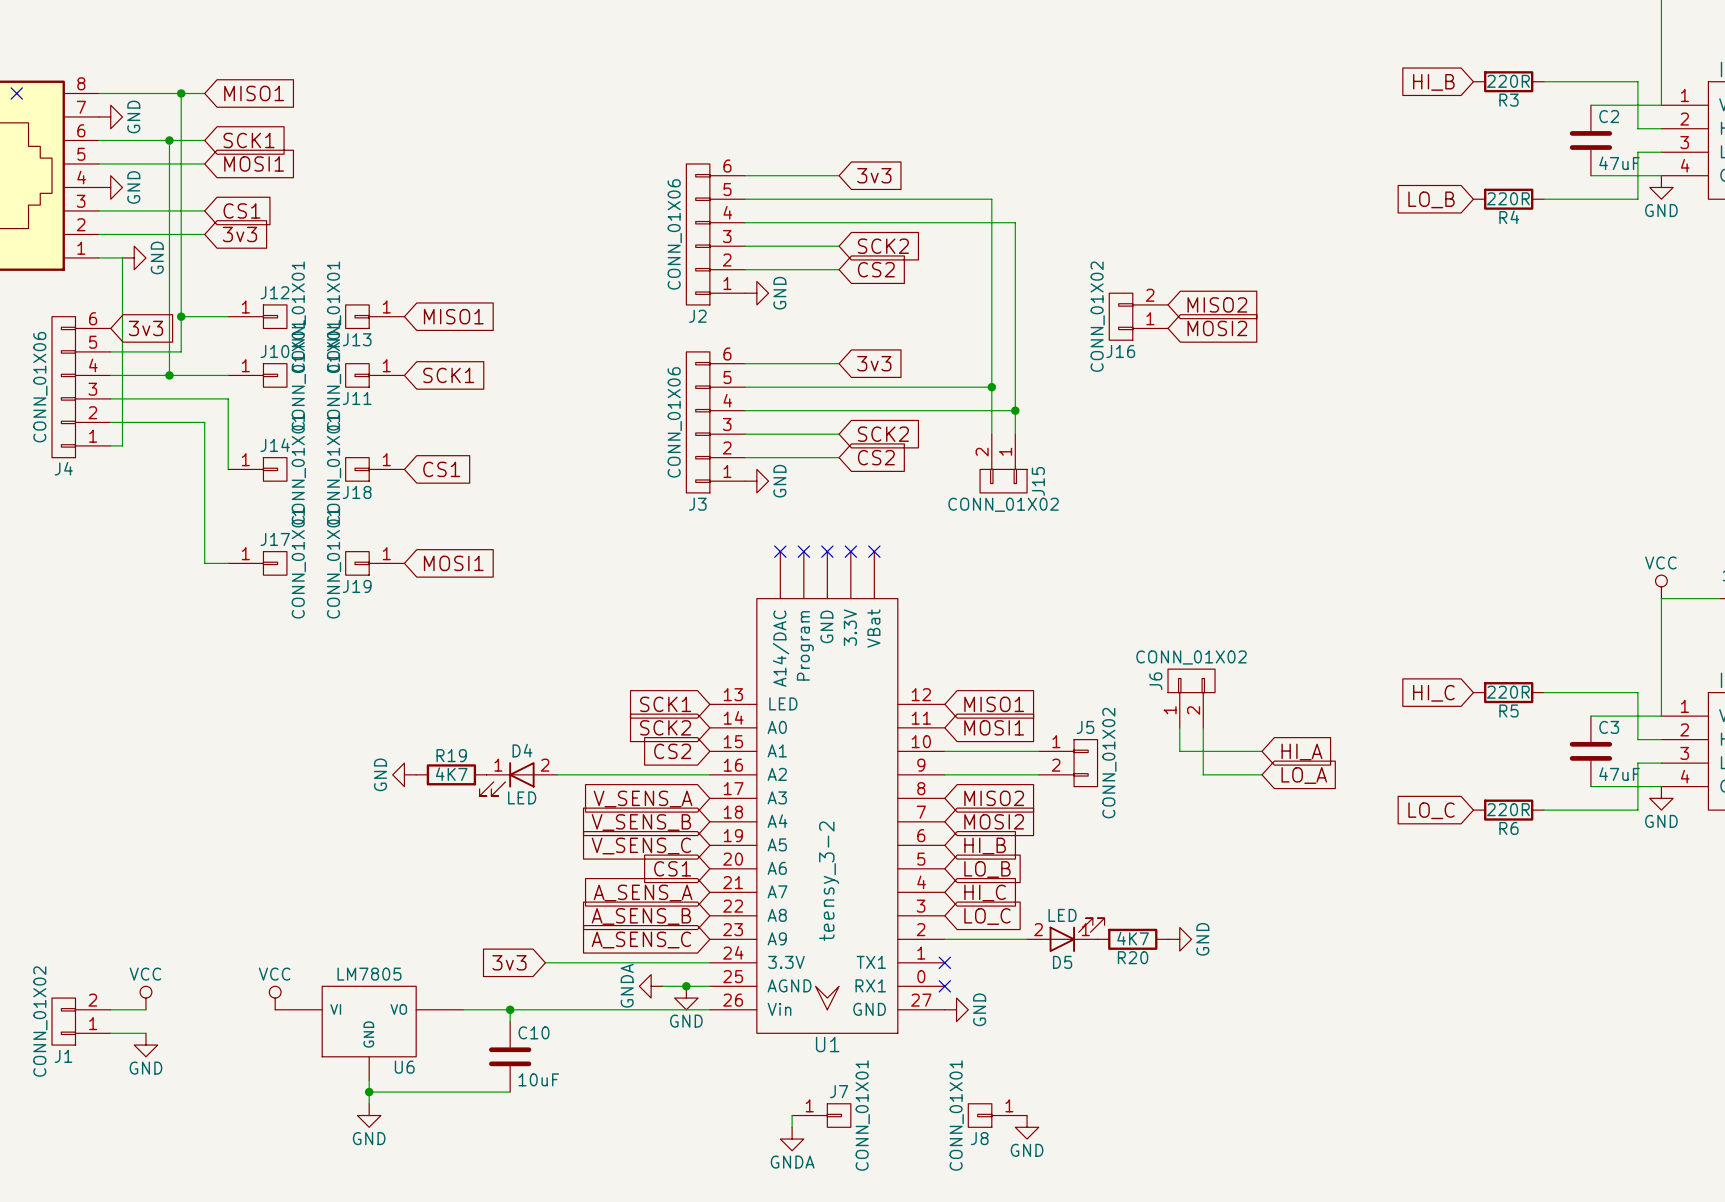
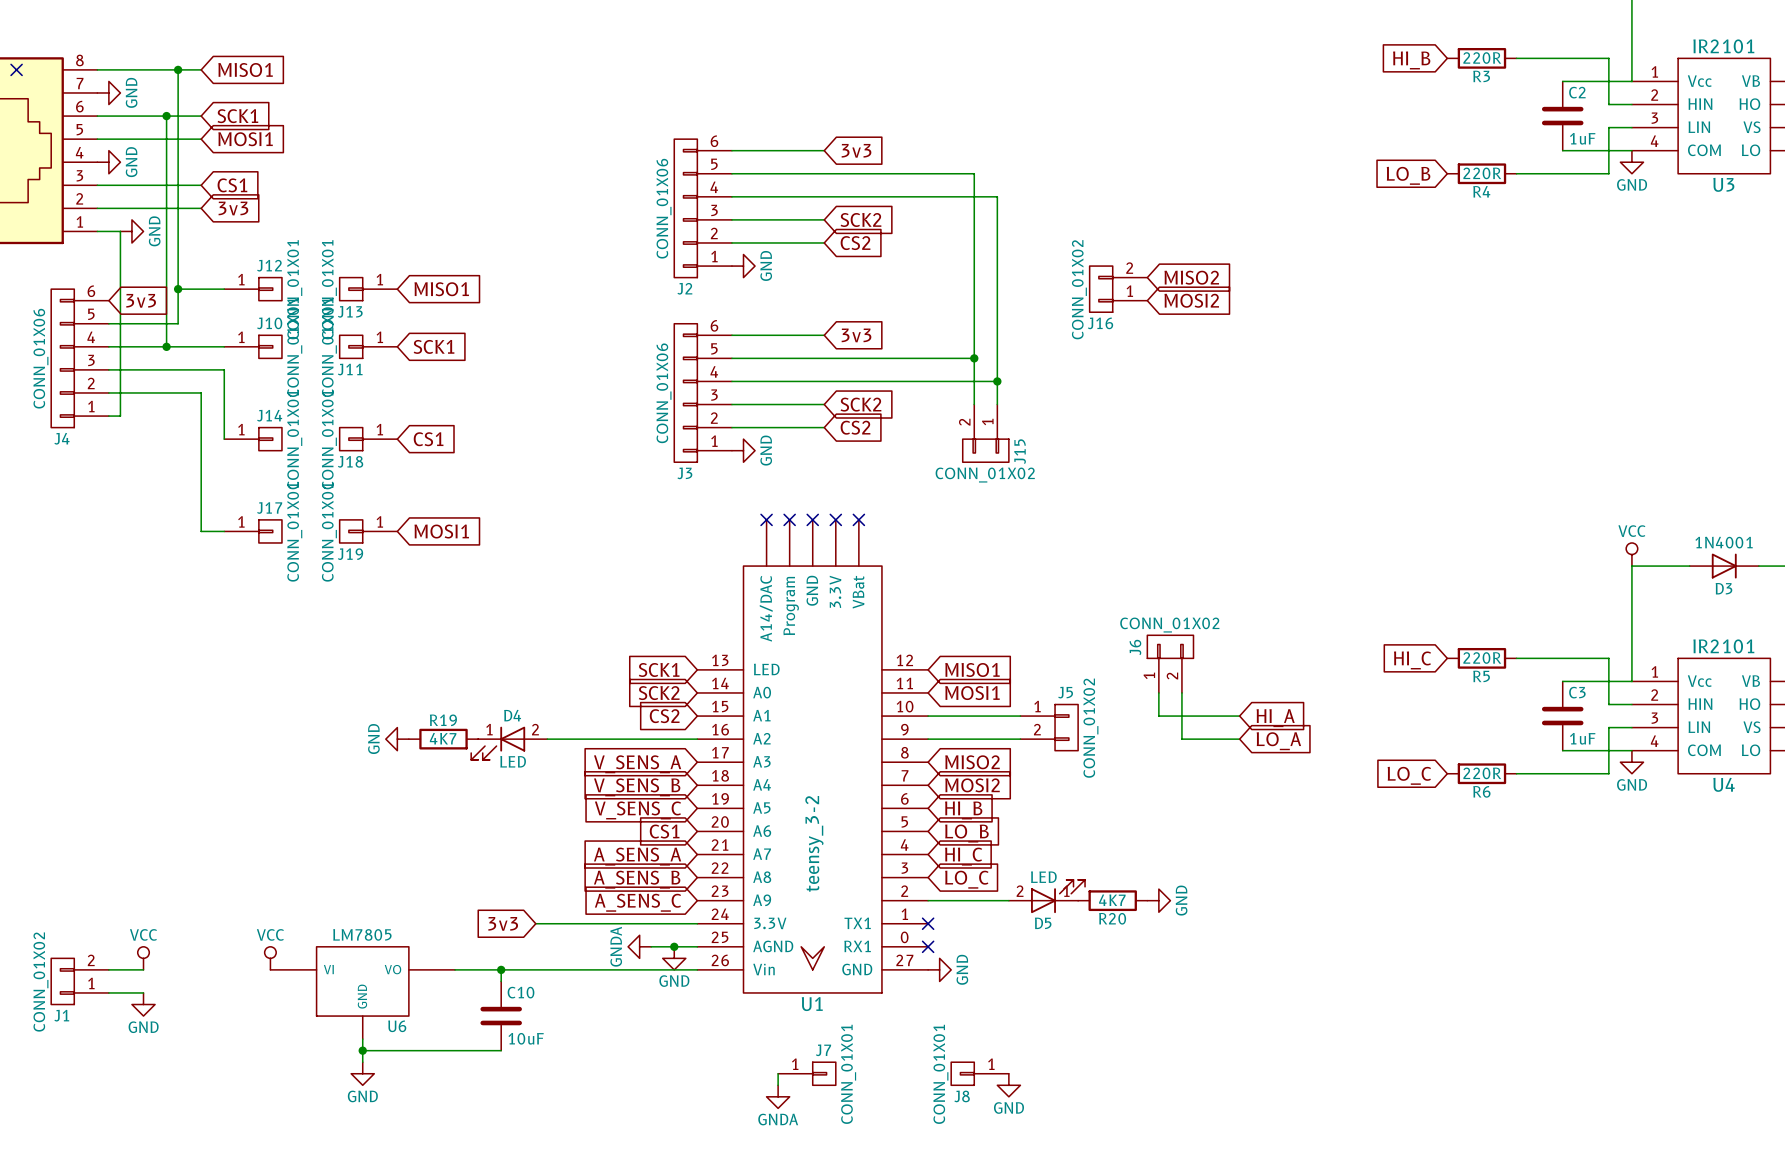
C2 value: 47uF (1619, 163) -> 1uF (1582, 138)
C3 value: 47uF (1619, 774) -> 1uF (1582, 738)

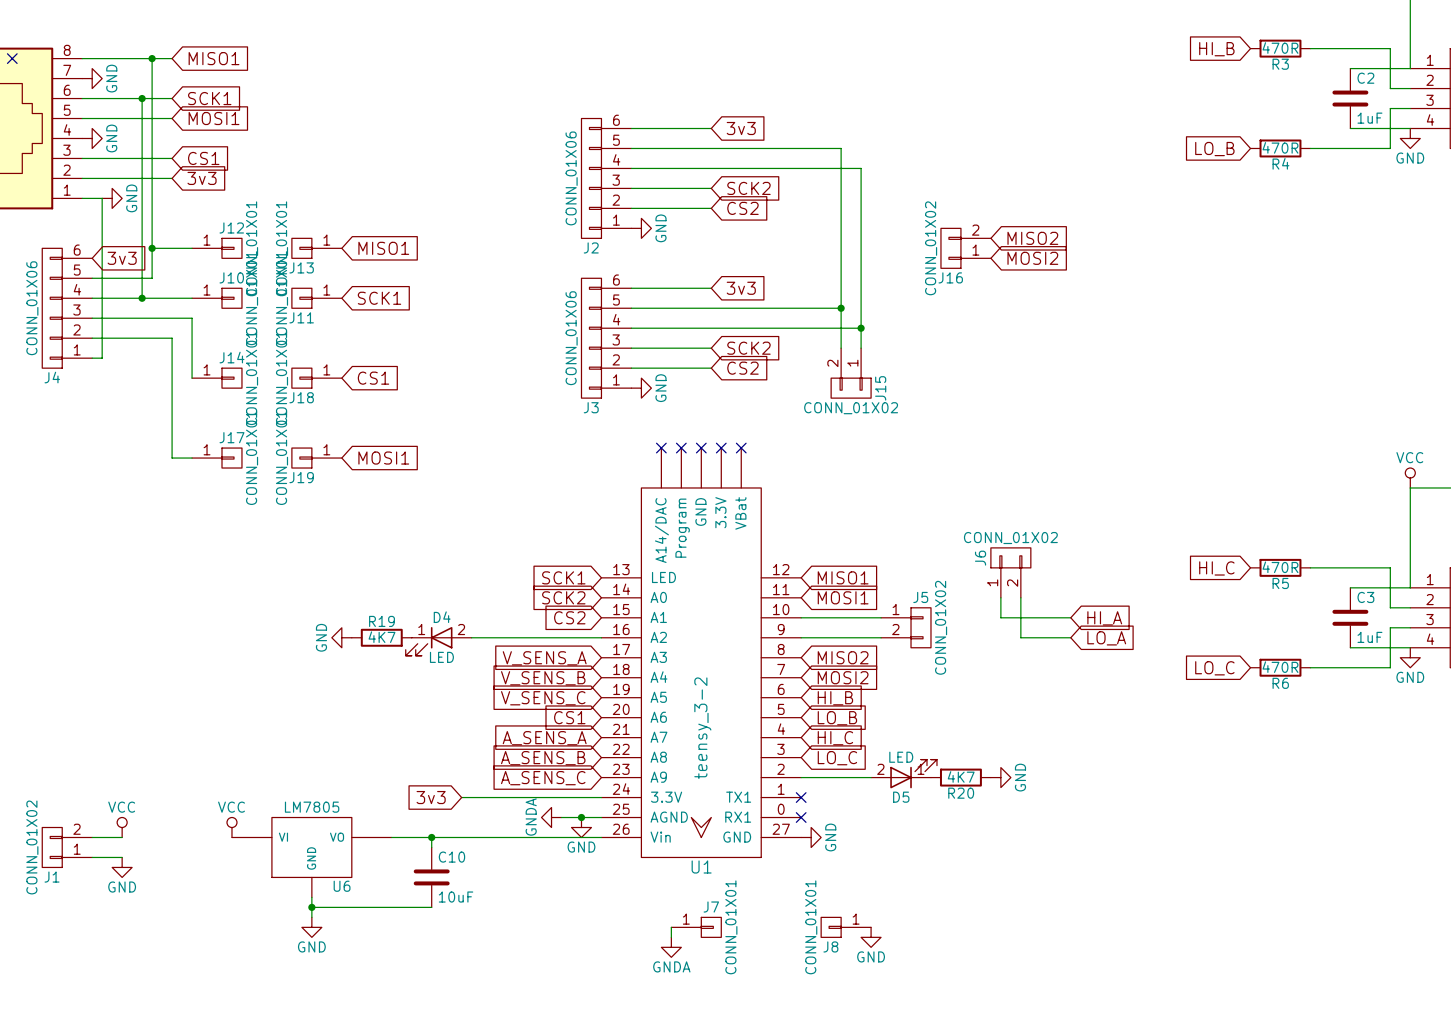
R3 value: 220R (1482, 58) -> 470R (1280, 48)
R4 value: 220R (1482, 173) -> 470R (1280, 147)
R5 value: 220R (1482, 658) -> 470R (1280, 567)
R6 value: 220R (1482, 773) -> 470R (1280, 667)

